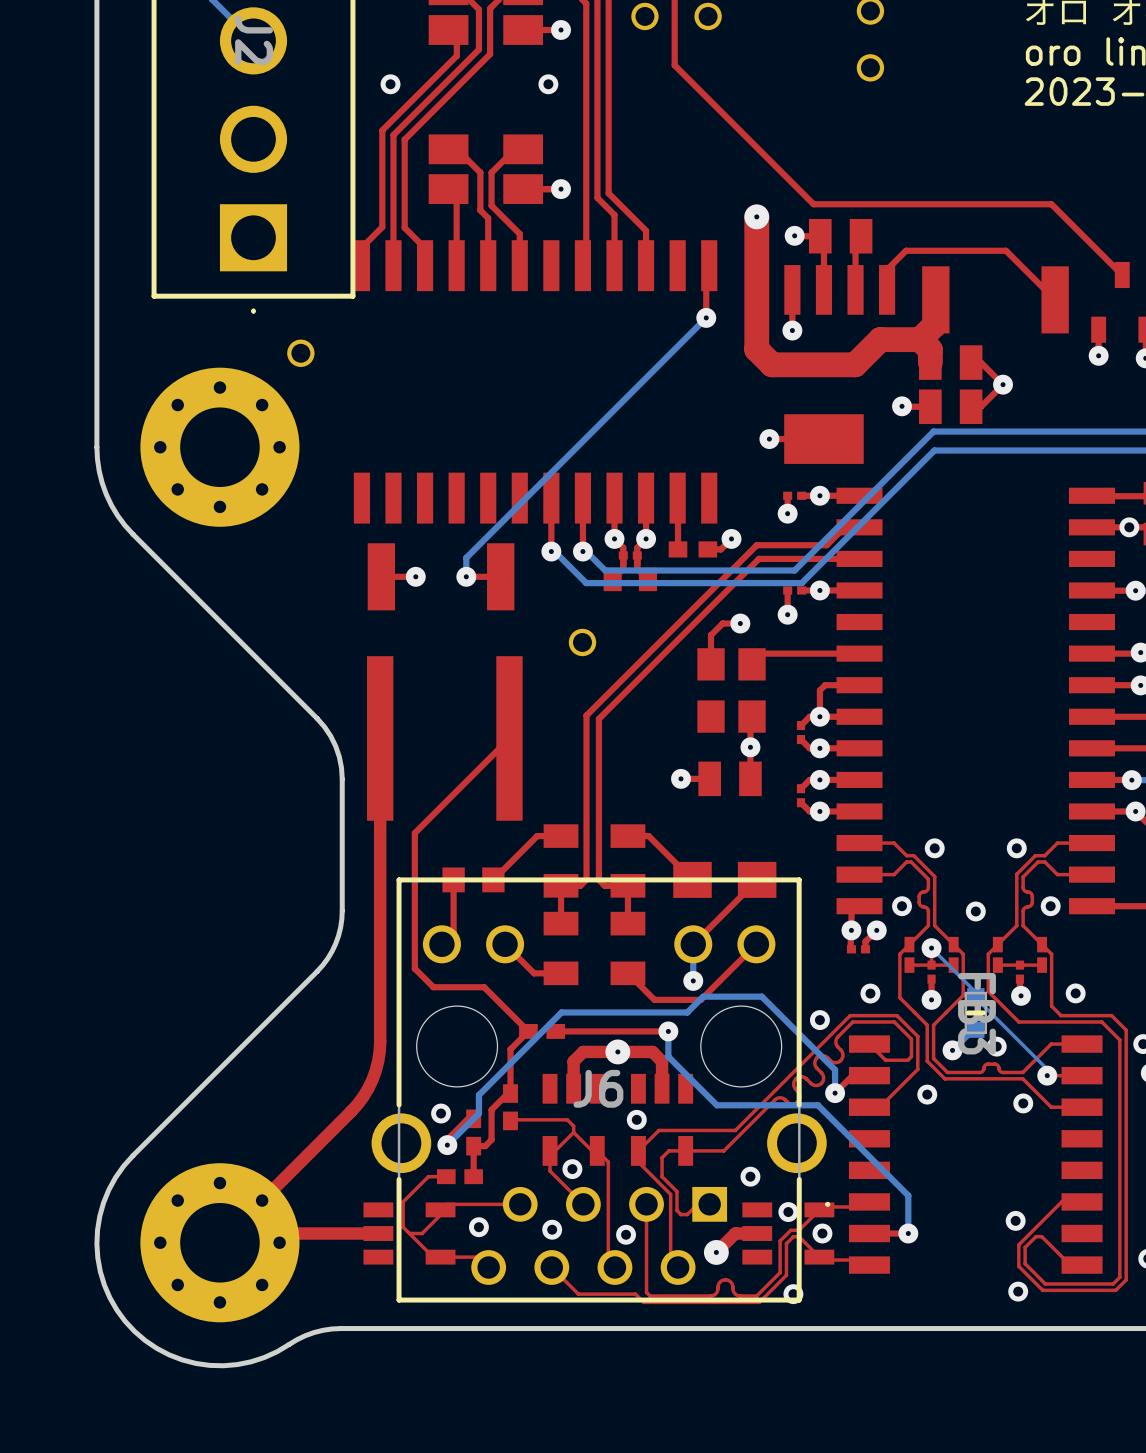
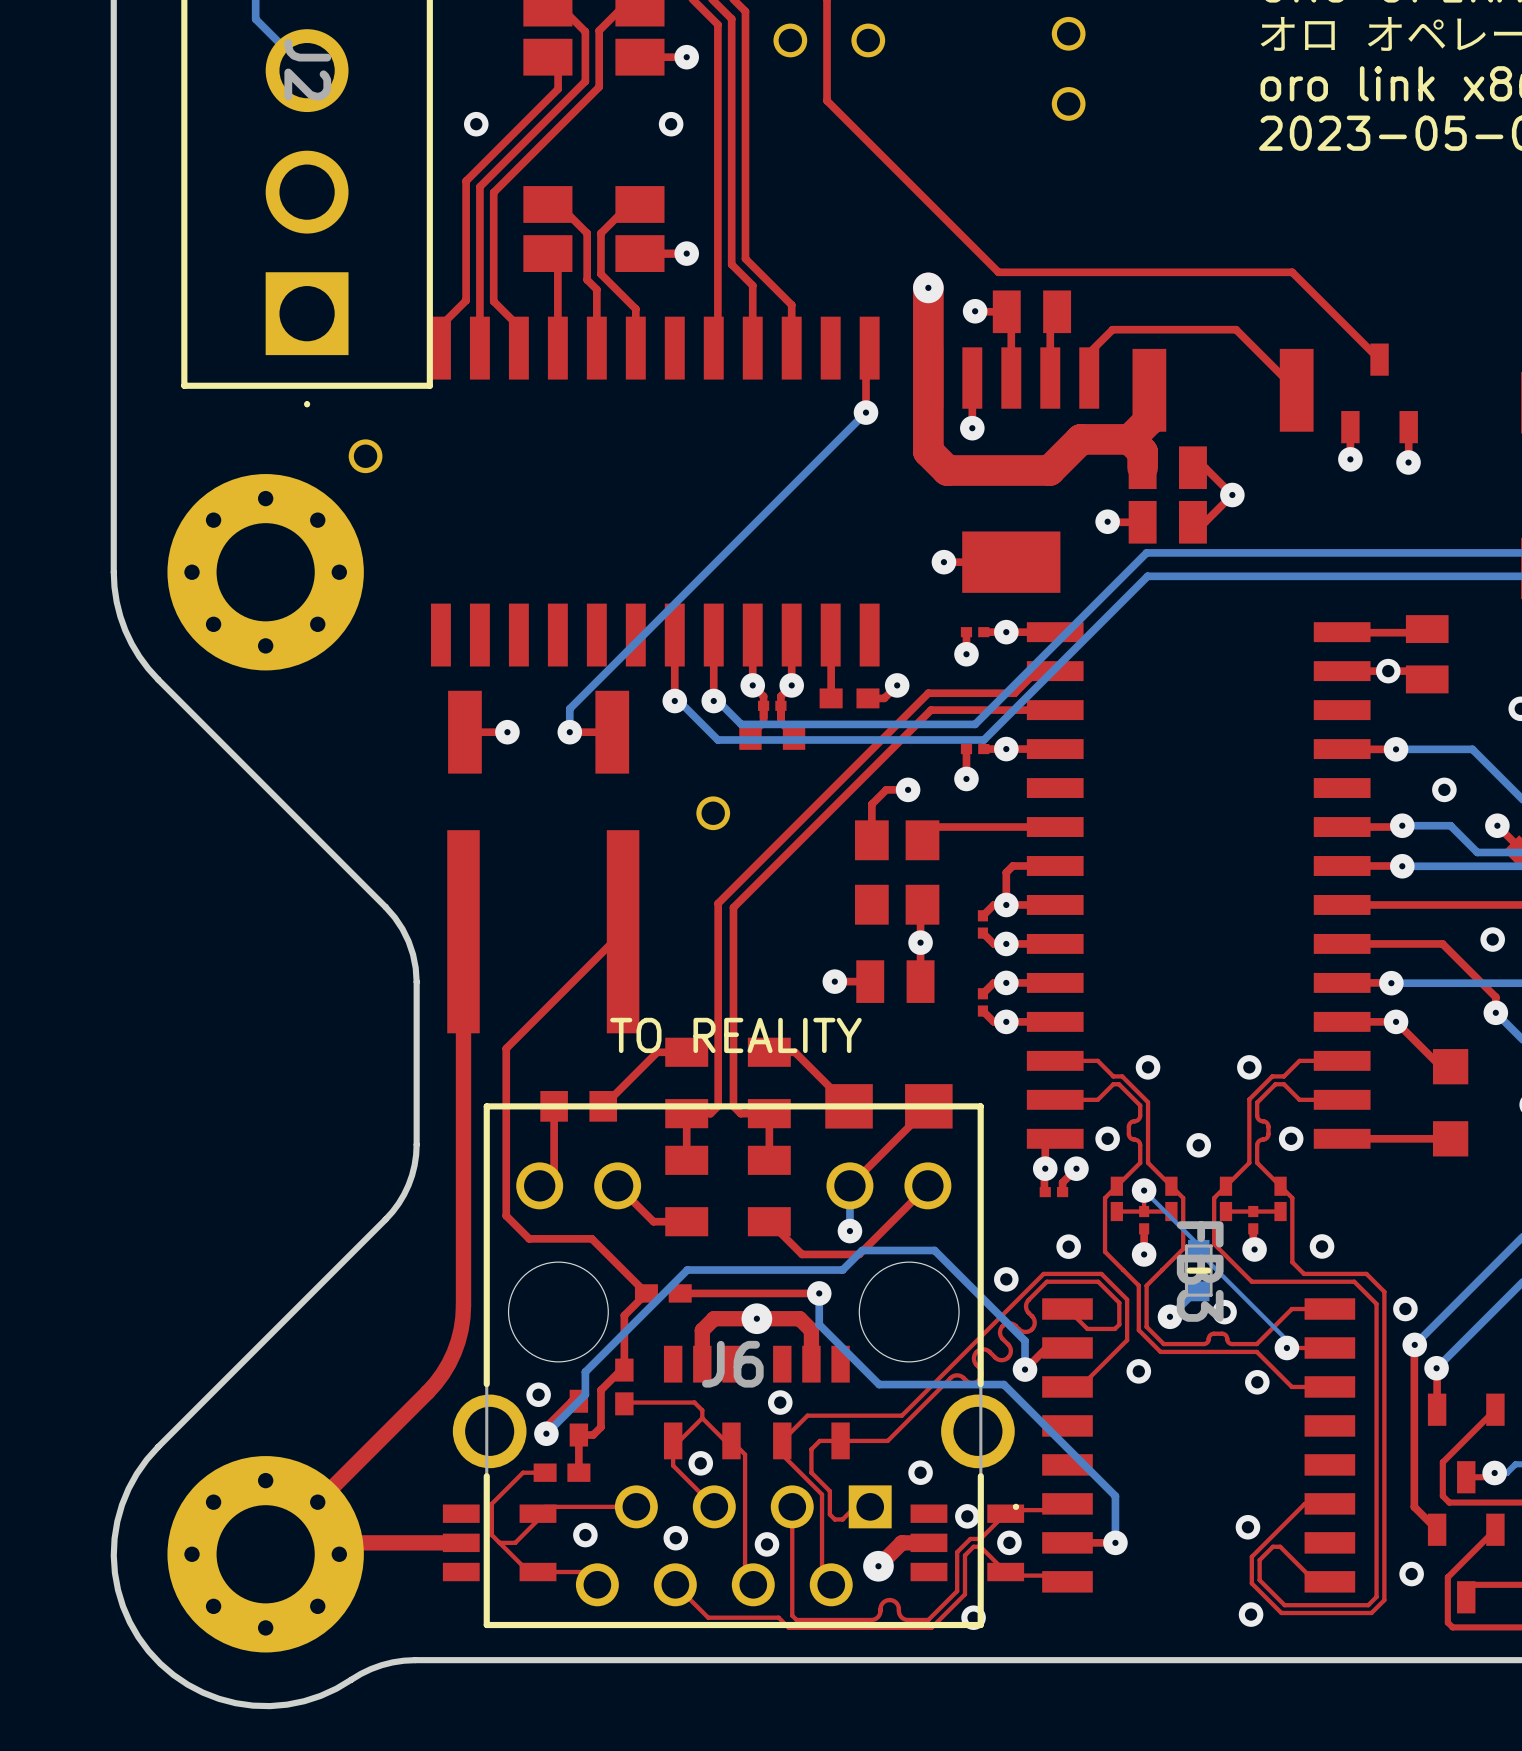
text: none -> TO REALITY (735, 1035)

